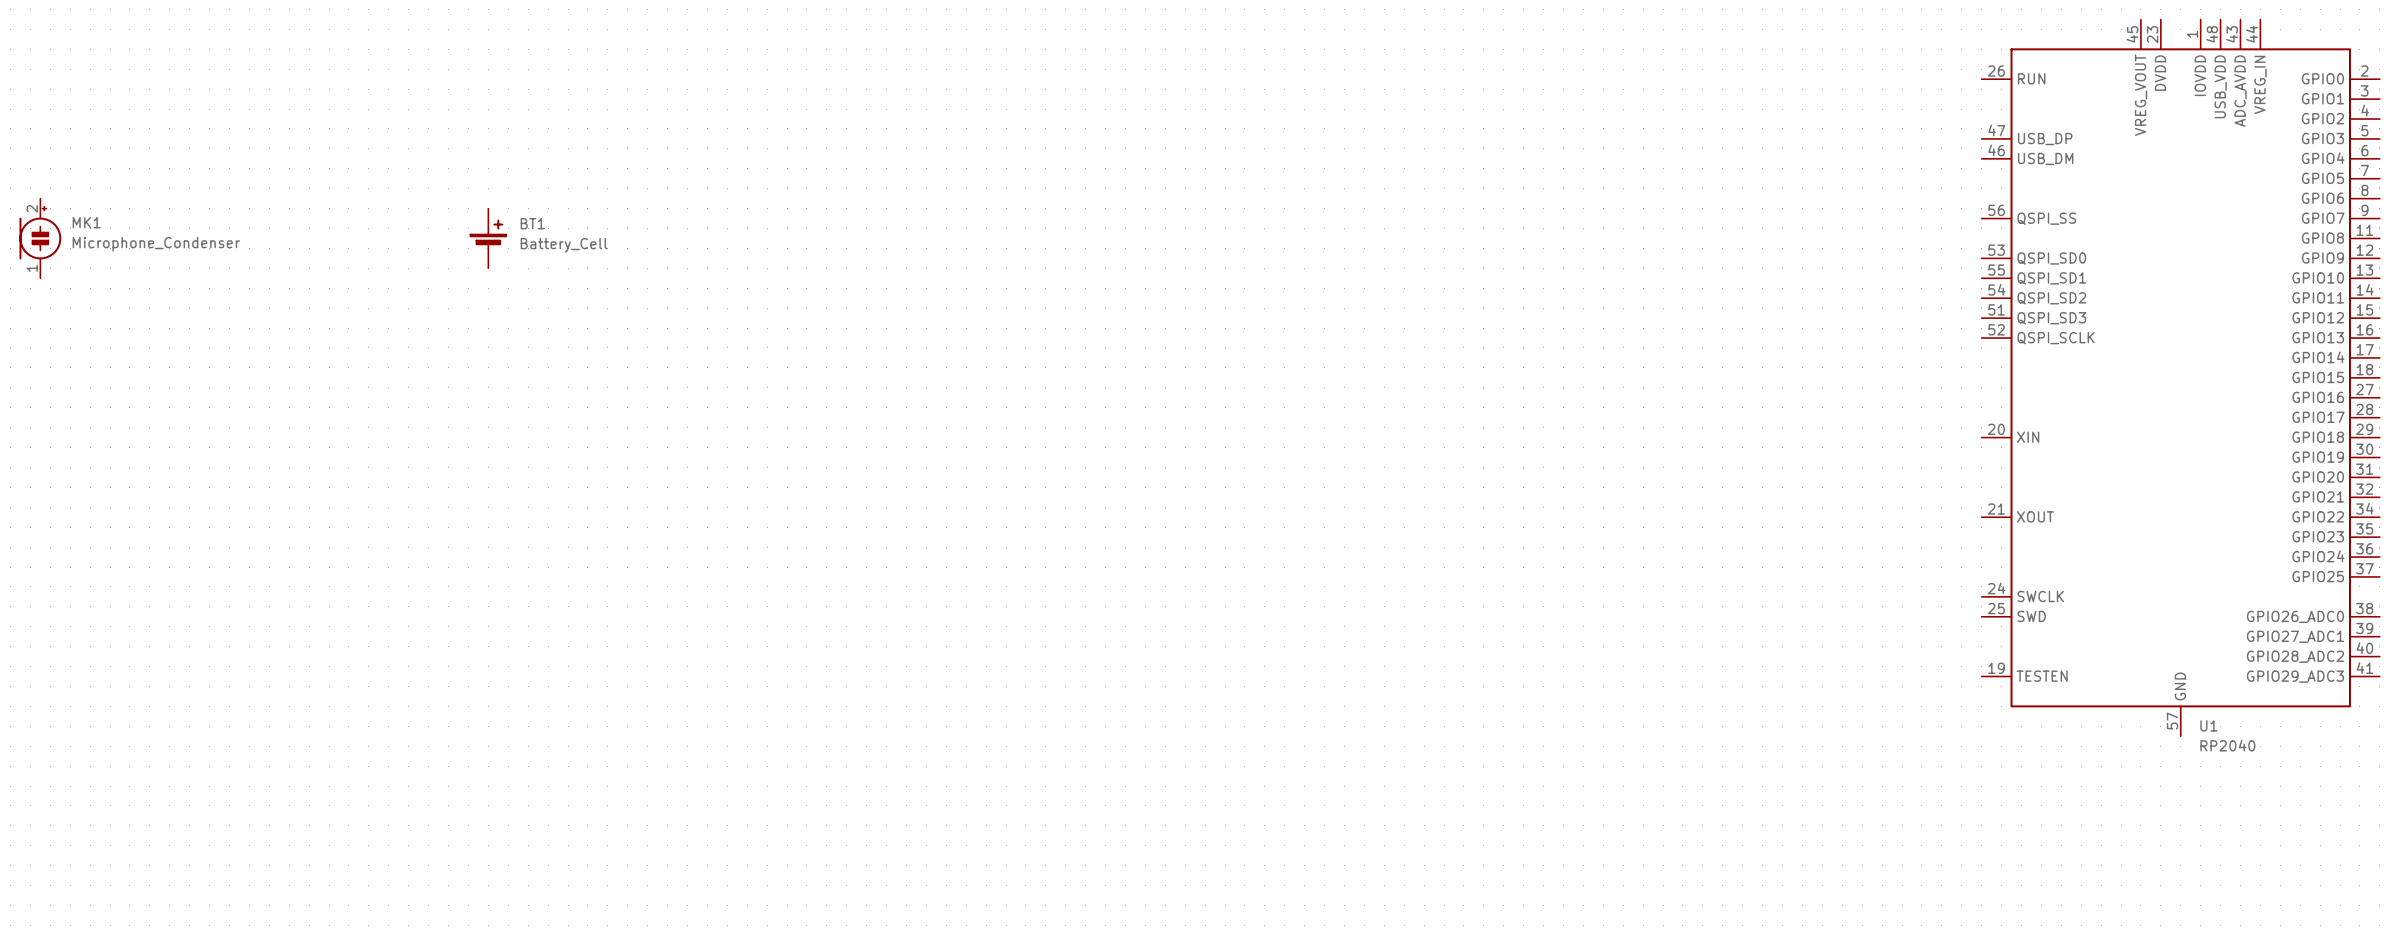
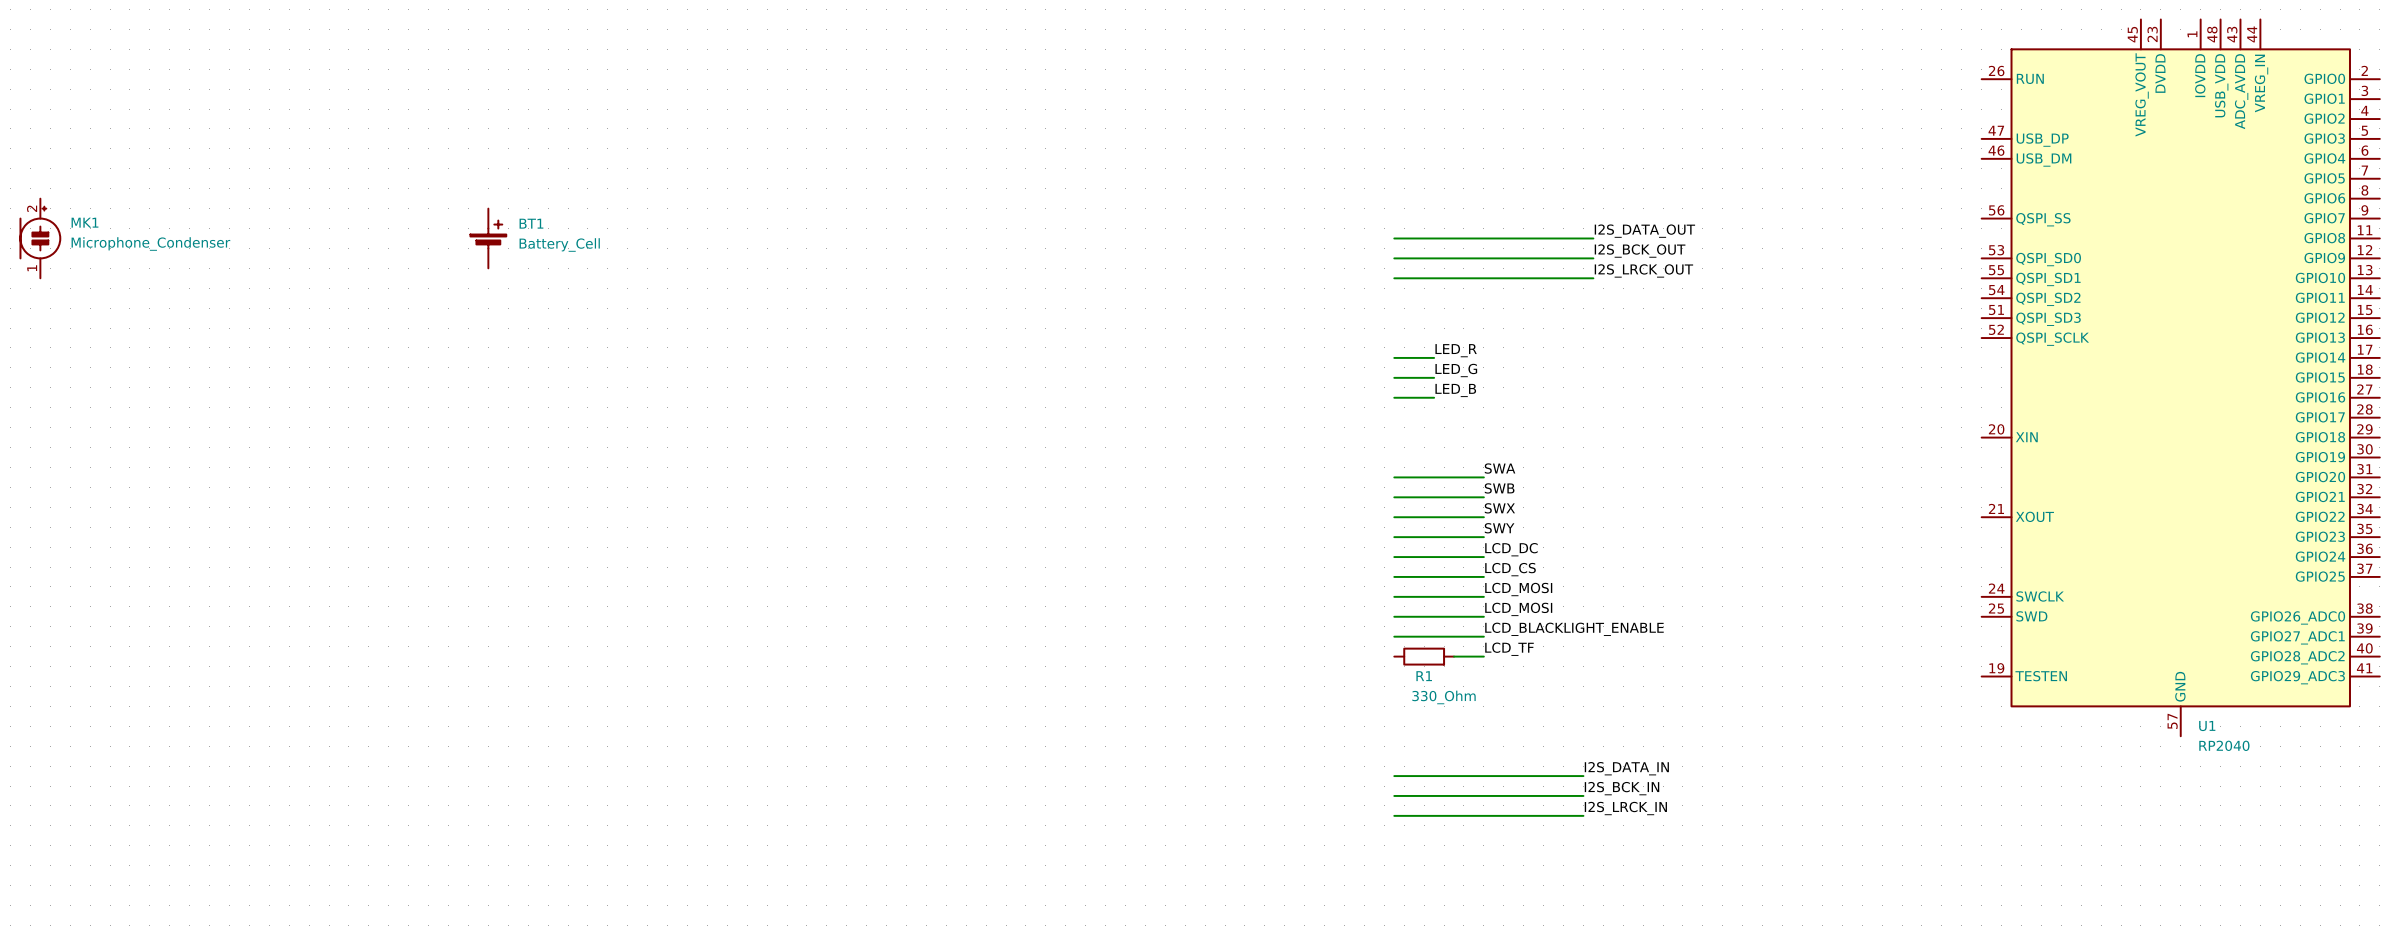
label: none -> I2S_DATA_OUT (1644, 231)
wire: none -> (1394, 238) (1593, 238)
label: none -> I2S_BCK_OUT (1640, 251)
wire: none -> (1394, 258) (1593, 258)
label: none -> I2S_LRCK_OUT (1643, 270)
wire: none -> (1394, 278) (1593, 278)
label: none -> LED_R (1456, 350)
wire: none -> (1394, 357) (1434, 357)
label: none -> LED_G (1456, 370)
wire: none -> (1394, 377) (1434, 377)
label: none -> LED_B (1455, 390)
wire: none -> (1394, 397) (1434, 397)
label: none -> SWA (1500, 468)
wire: none -> (1394, 477) (1483, 477)
label: none -> SWB (1499, 488)
wire: none -> (1394, 497) (1483, 497)
label: none -> SWX (1499, 508)
wire: none -> (1394, 517) (1483, 517)
label: none -> SWY (1499, 528)
wire: none -> (1394, 537) (1483, 537)
label: none -> LCD_DC (1511, 549)
wire: none -> (1394, 557) (1483, 557)
label: none -> LCD_CS (1510, 569)
wire: none -> (1394, 576) (1483, 576)
label: none -> LCD_MOSI (1518, 589)
wire: none -> (1394, 596) (1483, 596)
label: none -> LCD_MOSI (1518, 609)
wire: none -> (1394, 616) (1483, 616)
label: none -> LCD_BLACKLIGHT_ENABLE (1574, 629)
wire: none -> (1394, 636) (1483, 636)
label: none -> LCD_TF (1509, 649)
R1: none -> 330_Ohm (1424, 656)
wire: none -> (1454, 656) (1483, 656)
label: none -> I2S_DATA_IN (1626, 768)
wire: none -> (1394, 776) (1583, 776)
label: none -> I2S_BCK_IN (1622, 788)
wire: none -> (1394, 795) (1583, 795)
label: none -> I2S_LRCK_IN (1625, 808)
wire: none -> (1394, 815) (1583, 815)

